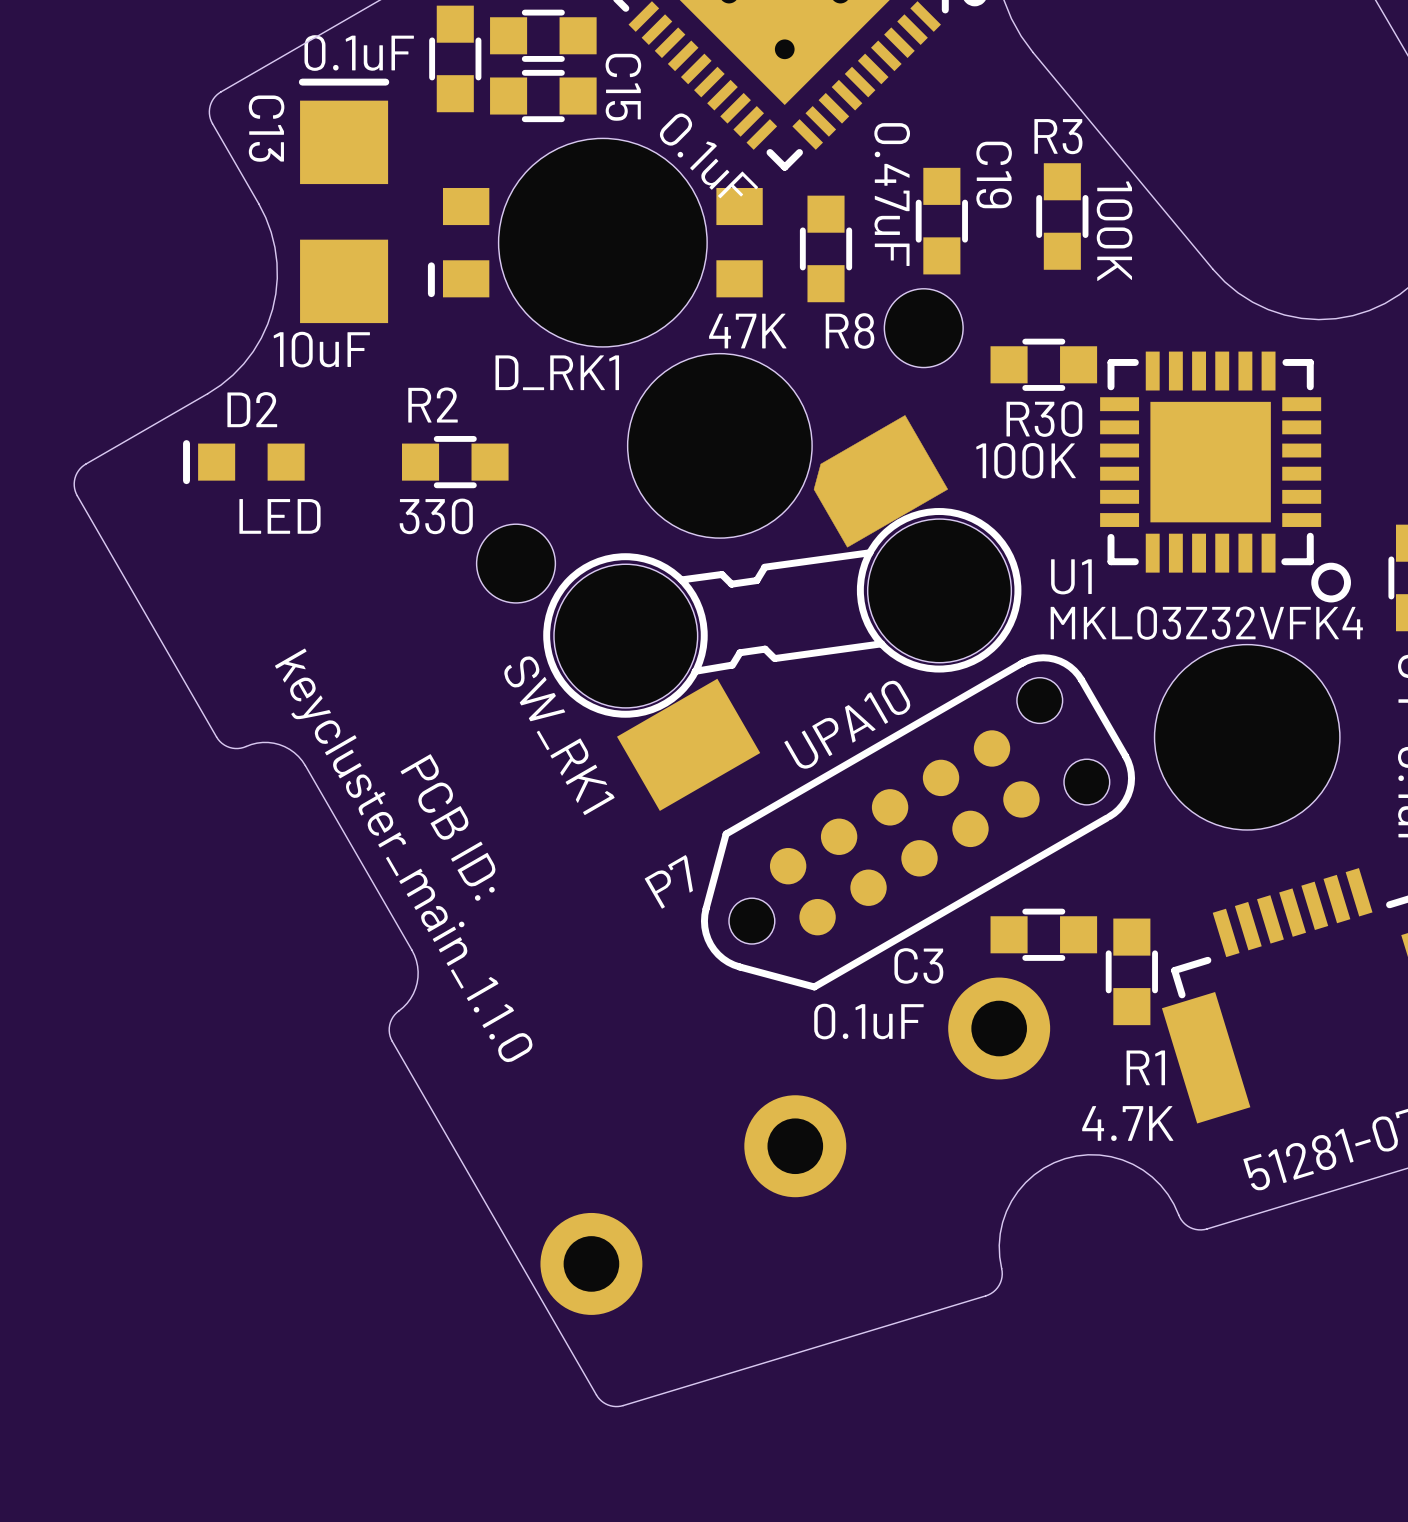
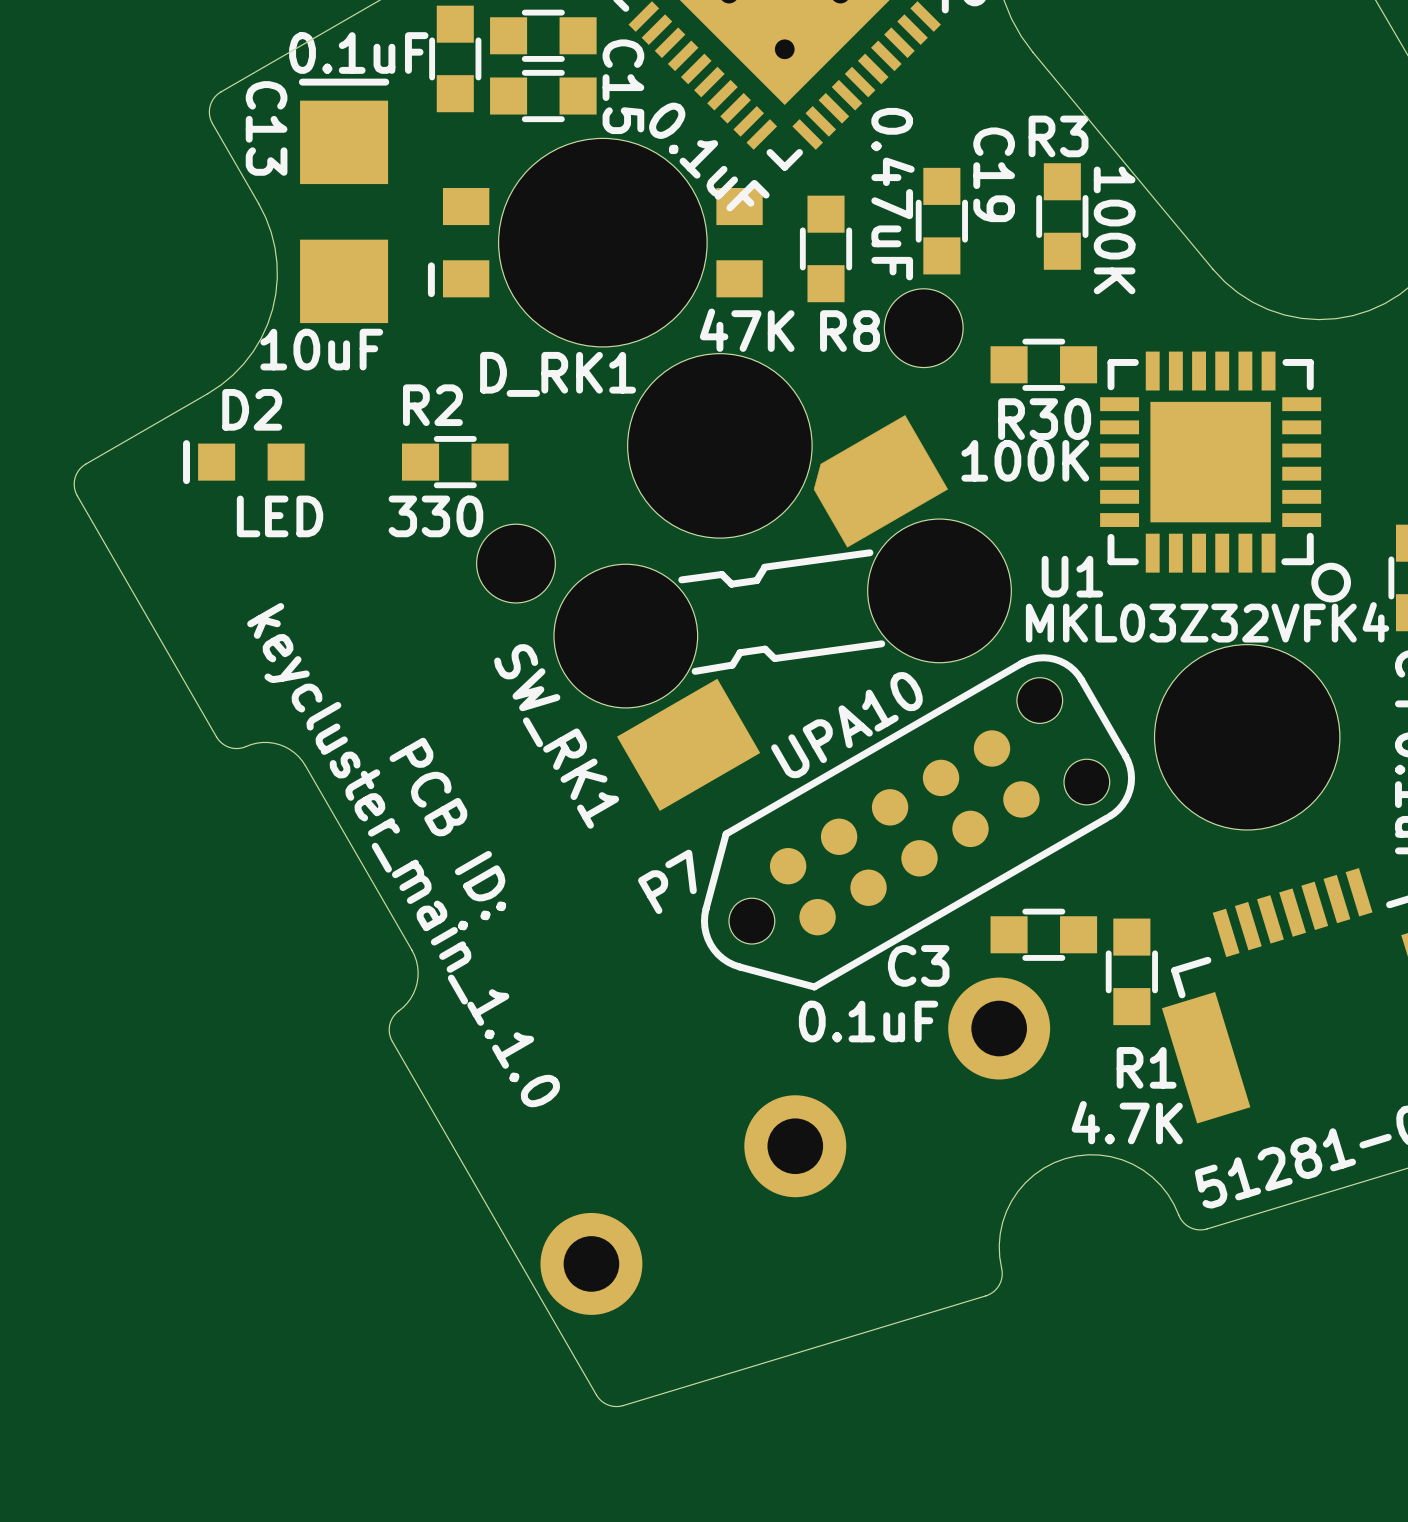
SW_RK1 footprint: [476, 288, 1022, 811] -> [476, 288, 1012, 811]

